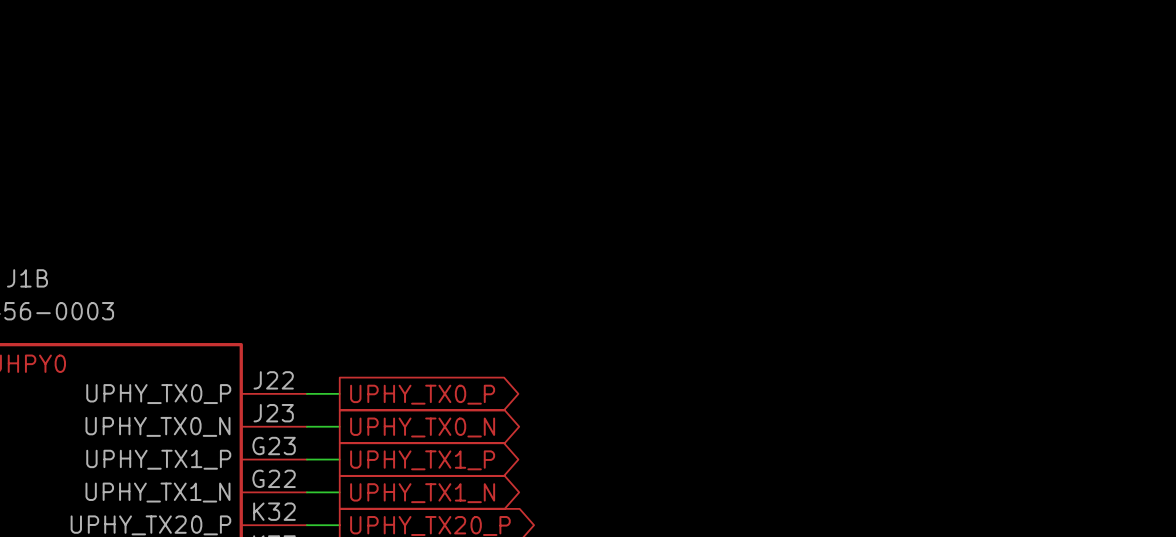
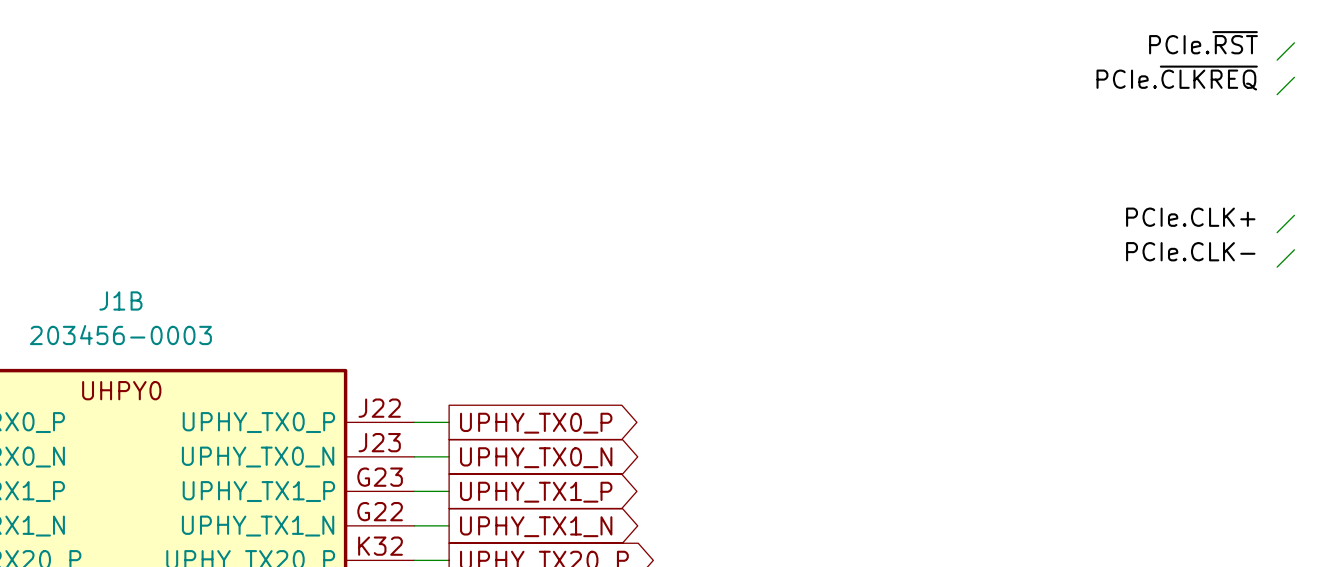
label: none -> PCIe.~{RST} (1203, 42)
wire: none -> (1294, 42) (1277, 60)
wire: none -> (1294, 77) (1277, 94)
label: none -> PCIe.~{CLKREQ} (1177, 78)
wire: none -> (1294, 215) (1277, 232)
label: none -> PCIe.CLK+ (1190, 217)
wire: none -> (1294, 249) (1277, 267)
label: none -> PCIe.CLK- (1190, 251)

